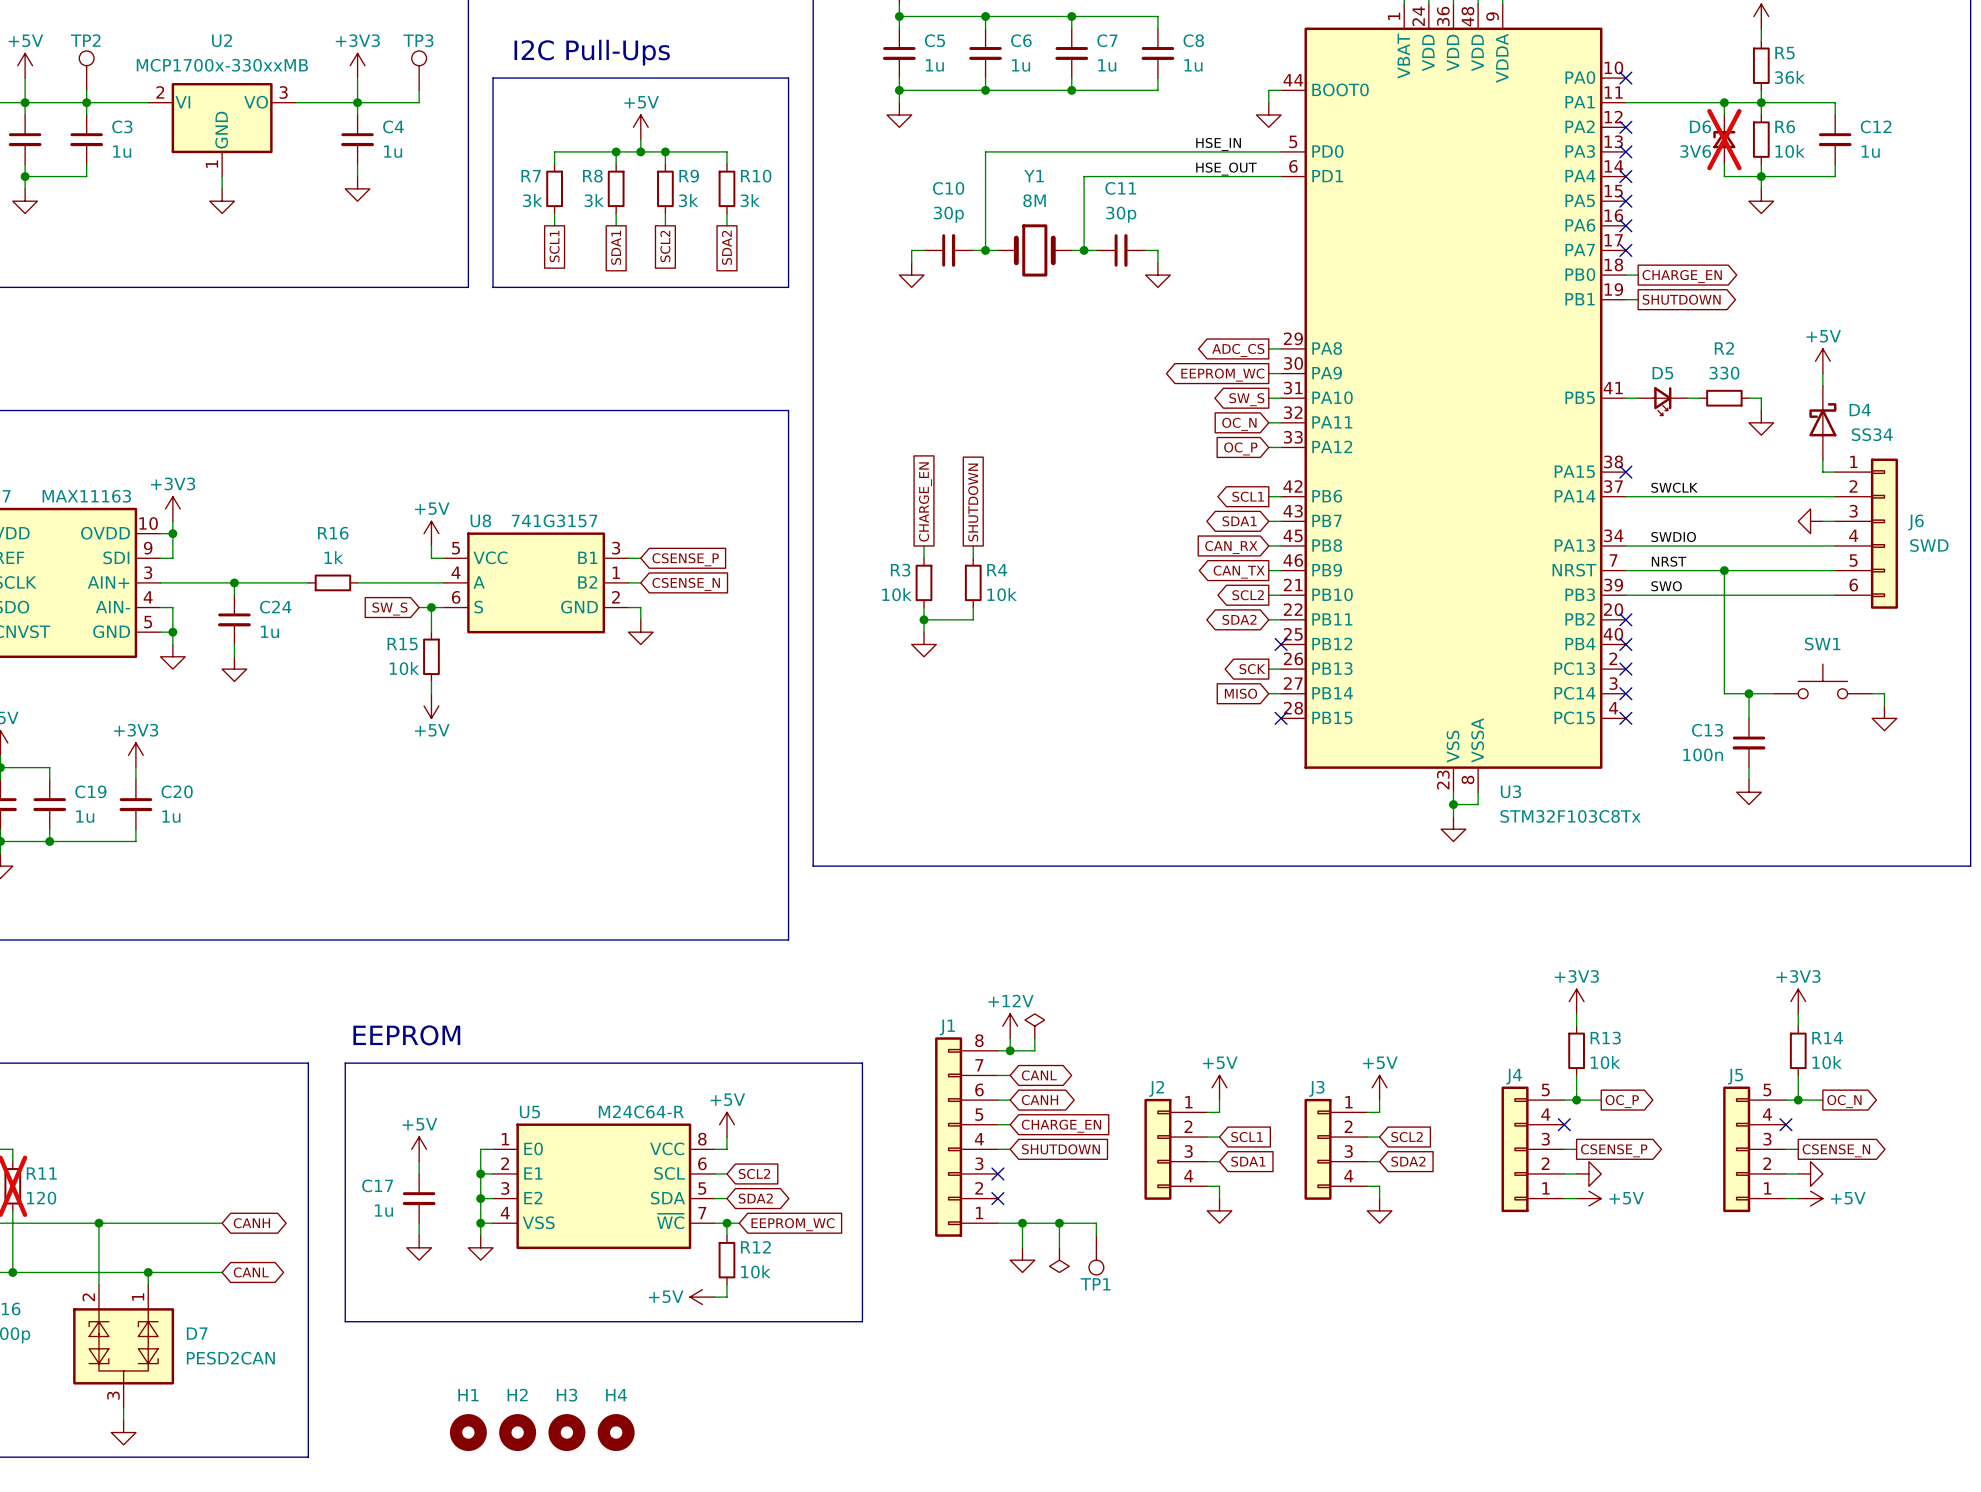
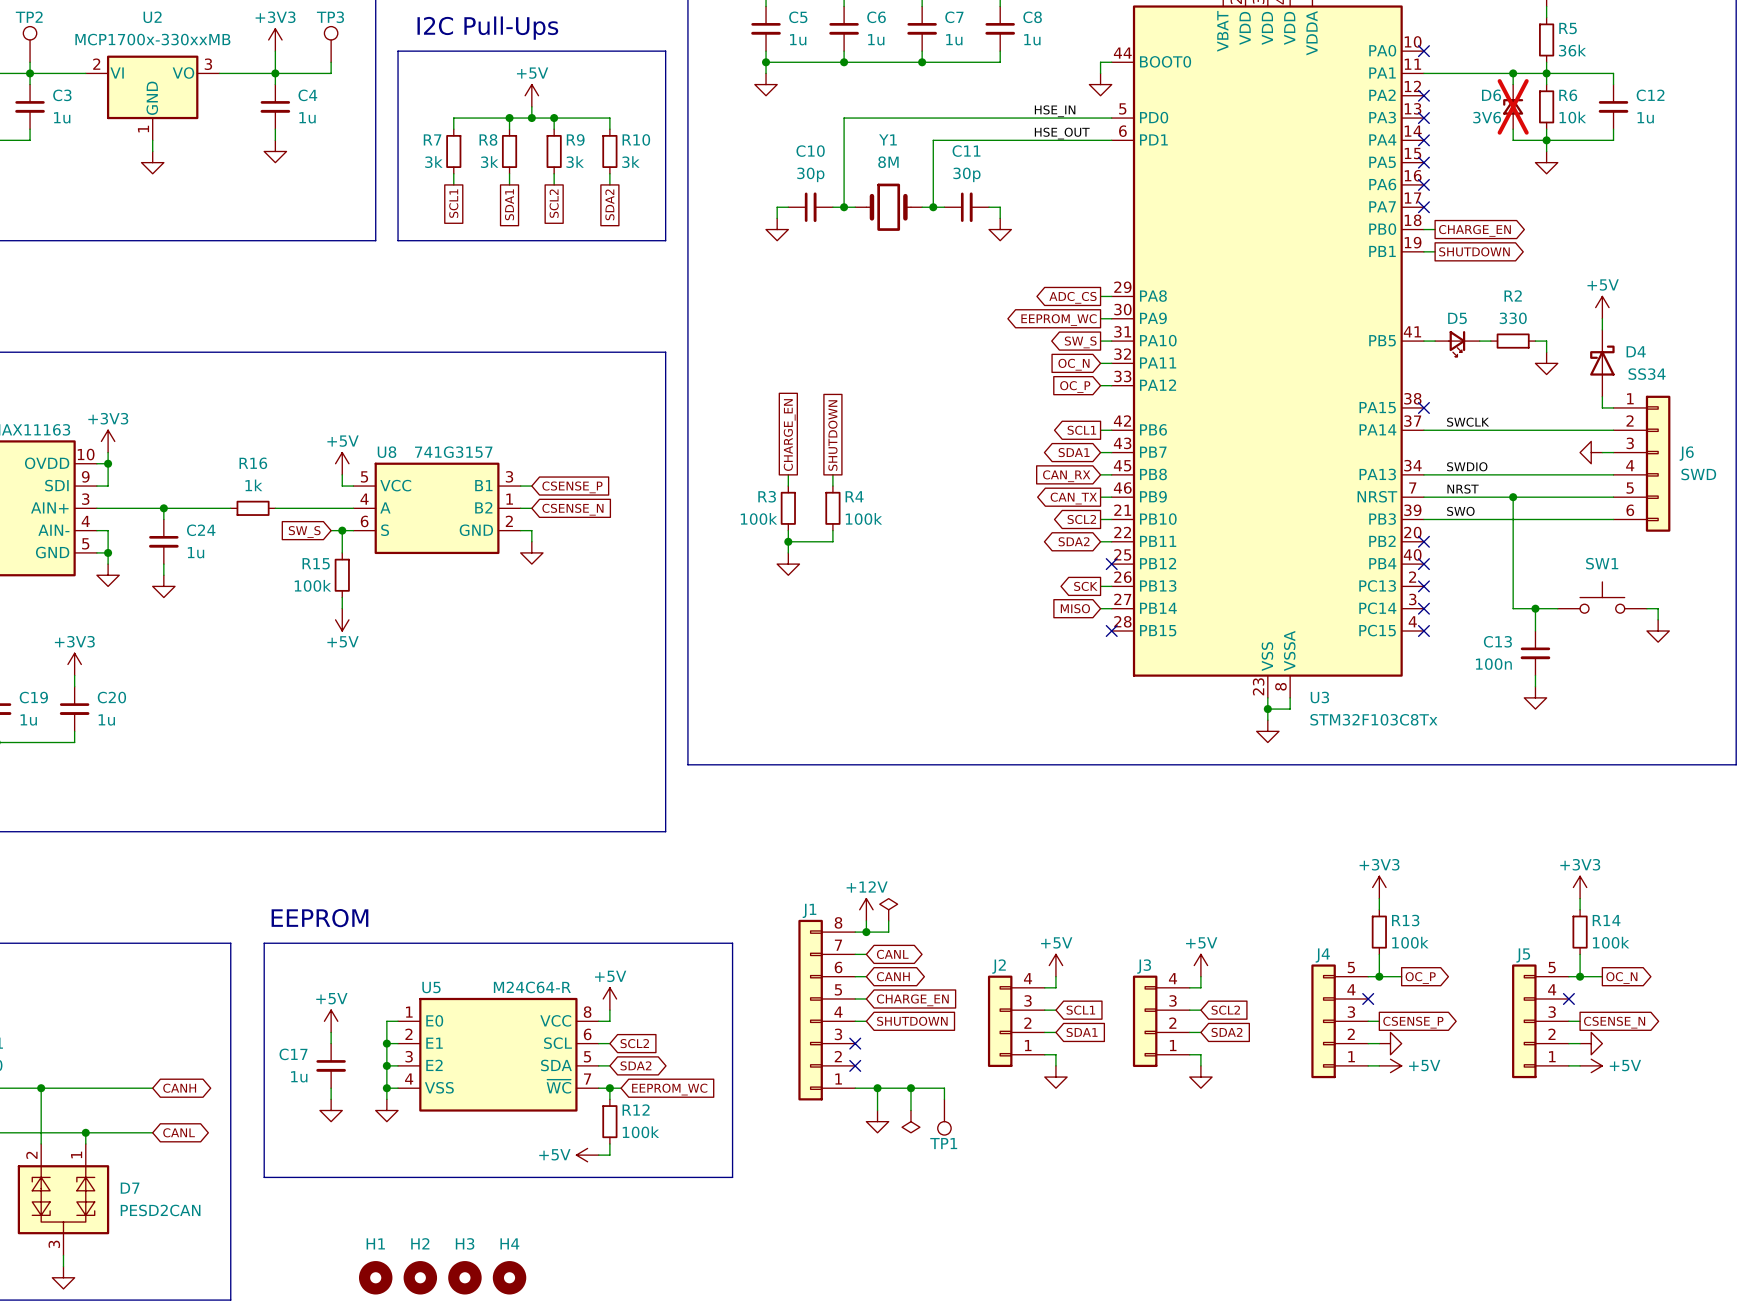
R3 value: 10k (896, 594) -> 100k (758, 518)
R4 value: 10k (1002, 594) -> 100k (863, 518)
R15 value: 10k (404, 668) -> 100k (312, 585)
R13 value: 10k (1605, 1062) -> 100k (1410, 942)
R14 value: 10k (1827, 1062) -> 100k (1611, 942)
J2 flip: as is (1157, 1149) -> up-down (1000, 1021)
J3 flip: as is (1318, 1149) -> up-down (1145, 1021)
R12 value: 10k (755, 1271) -> 100k (640, 1132)

